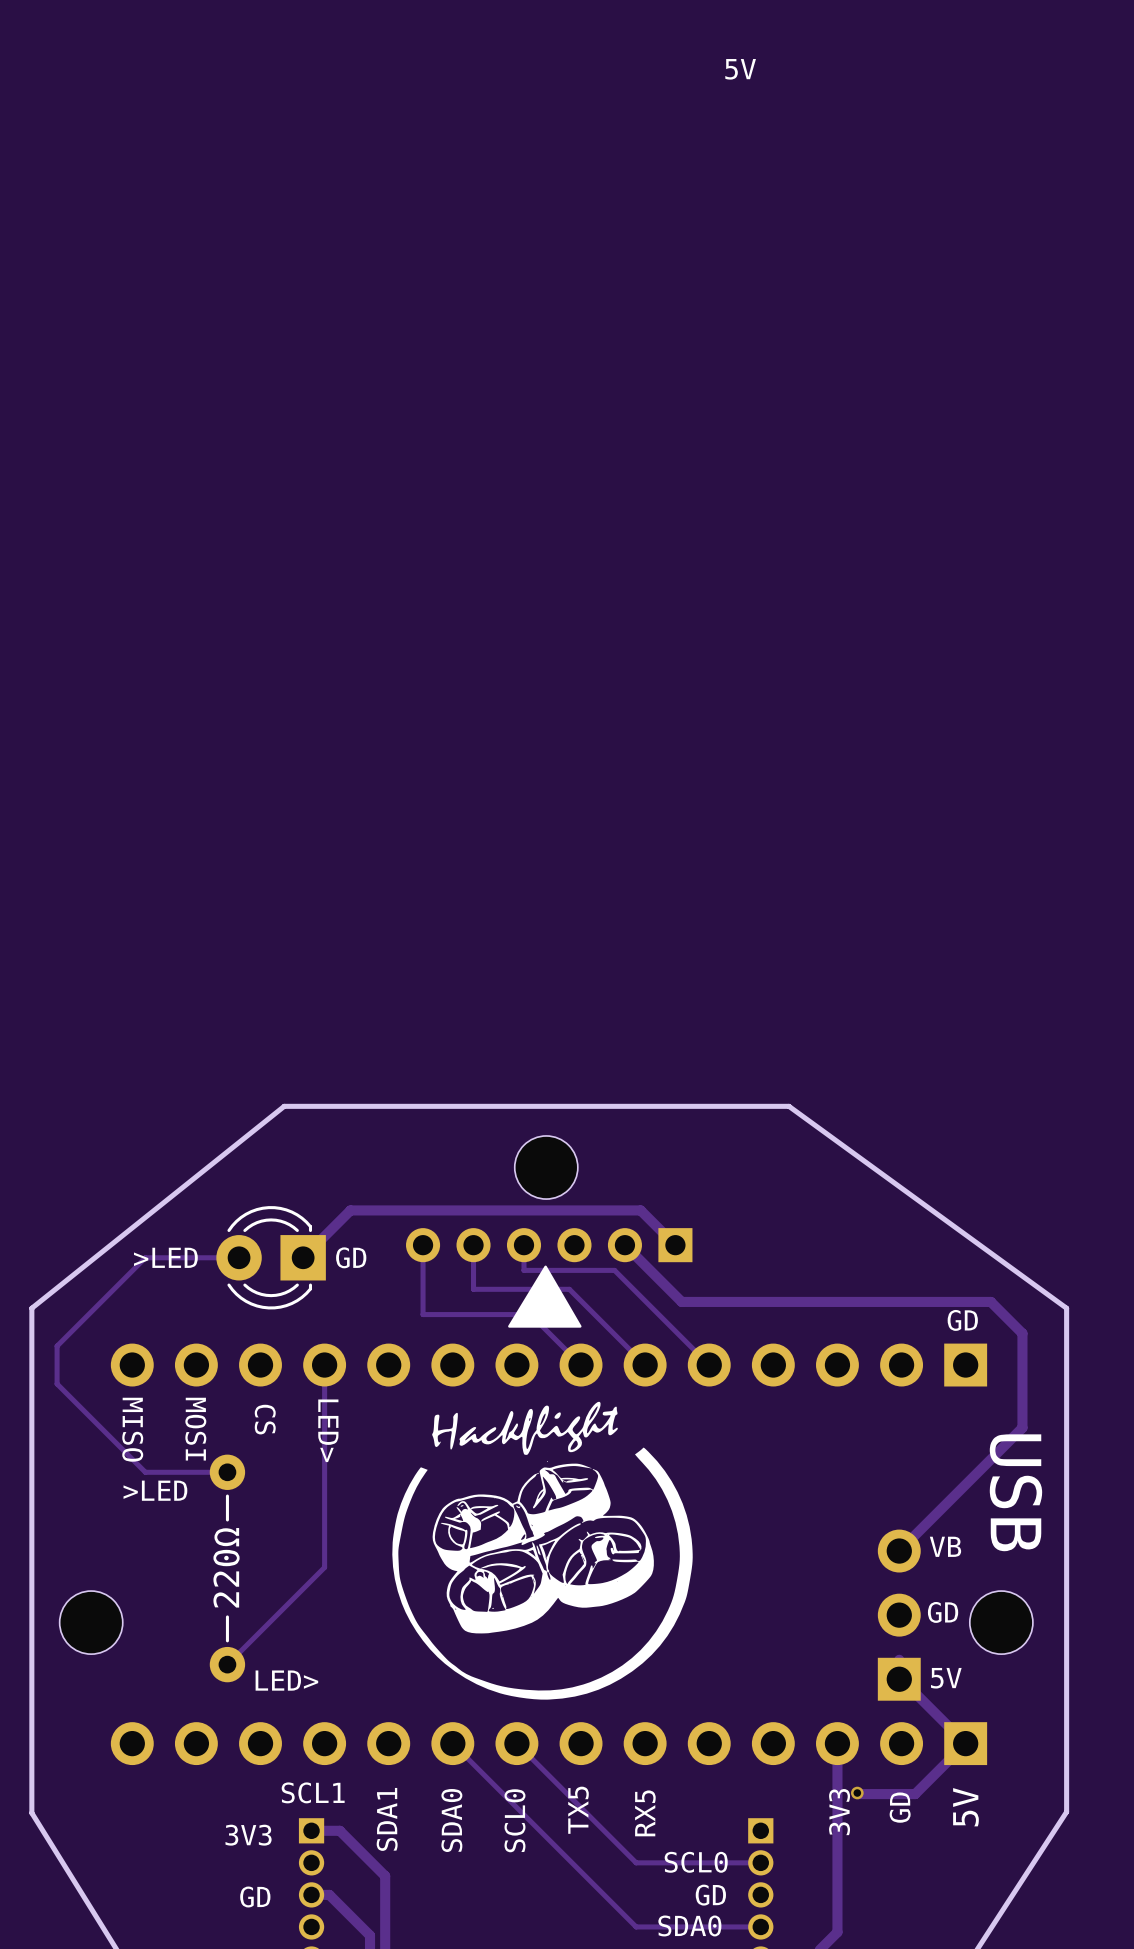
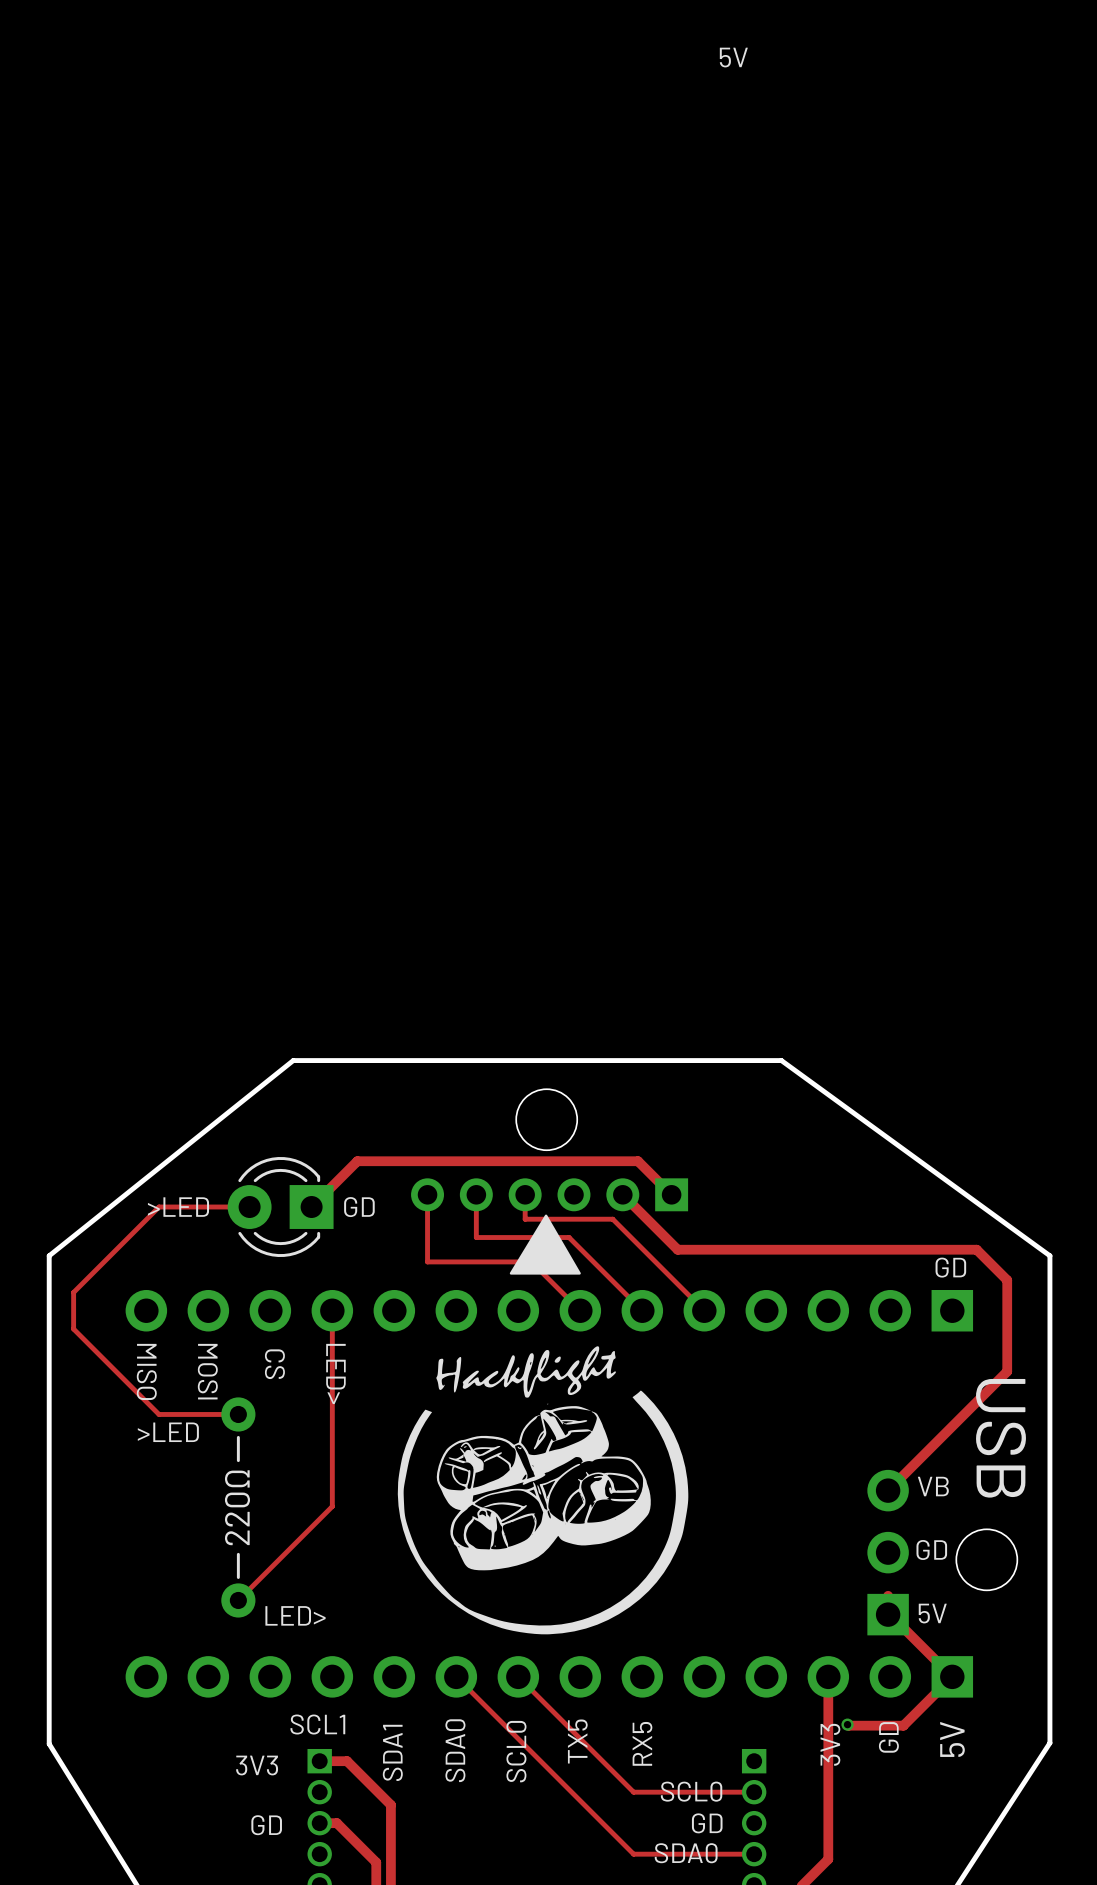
part: (91, 1622) -> none

